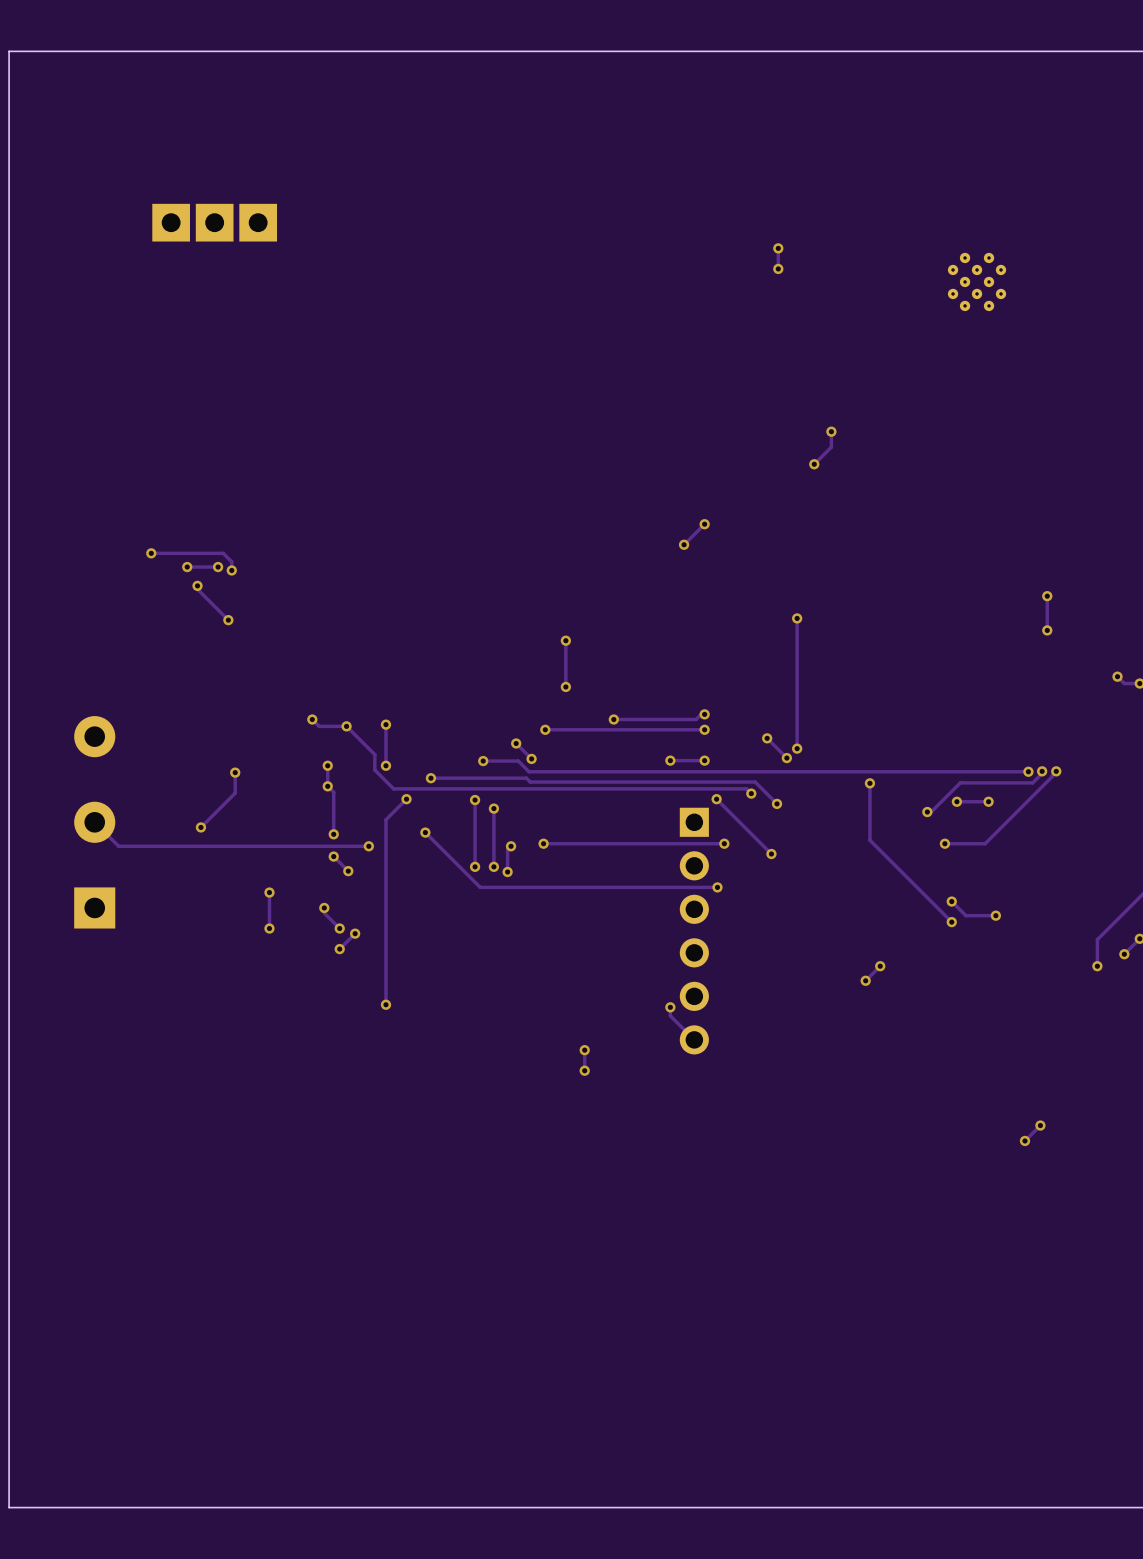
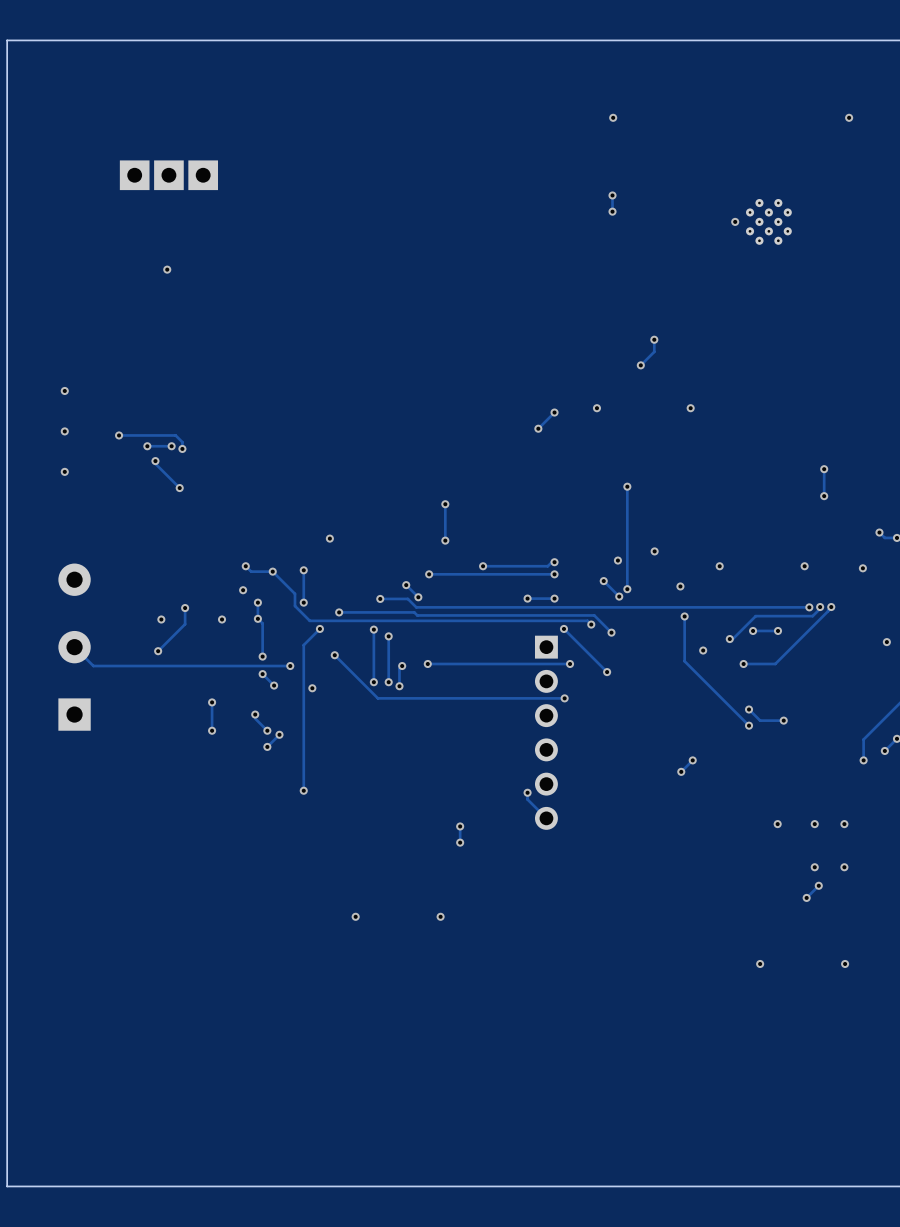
via: none -> (613, 117)
via: none -> (849, 117)
via: none -> (735, 221)
via: none -> (167, 269)
via: none -> (64, 390)
via: none -> (596, 408)
via: none -> (690, 408)
via: none -> (64, 431)
via: none -> (64, 471)
via: none -> (329, 538)
via: none -> (654, 551)
via: none -> (617, 560)
via: none -> (719, 566)
via: none -> (804, 566)
via: none -> (862, 568)
via: none -> (680, 586)
via: none -> (243, 590)
via: none -> (161, 619)
via: none -> (222, 619)
via: none -> (886, 642)
via: none -> (703, 650)
via: none -> (312, 688)
via: none -> (777, 824)
via: none -> (814, 824)
via: none -> (844, 824)
via: none -> (814, 867)
via: none -> (844, 867)
via: none -> (355, 916)
via: none -> (440, 916)
via: none -> (760, 963)
via: none -> (845, 963)

